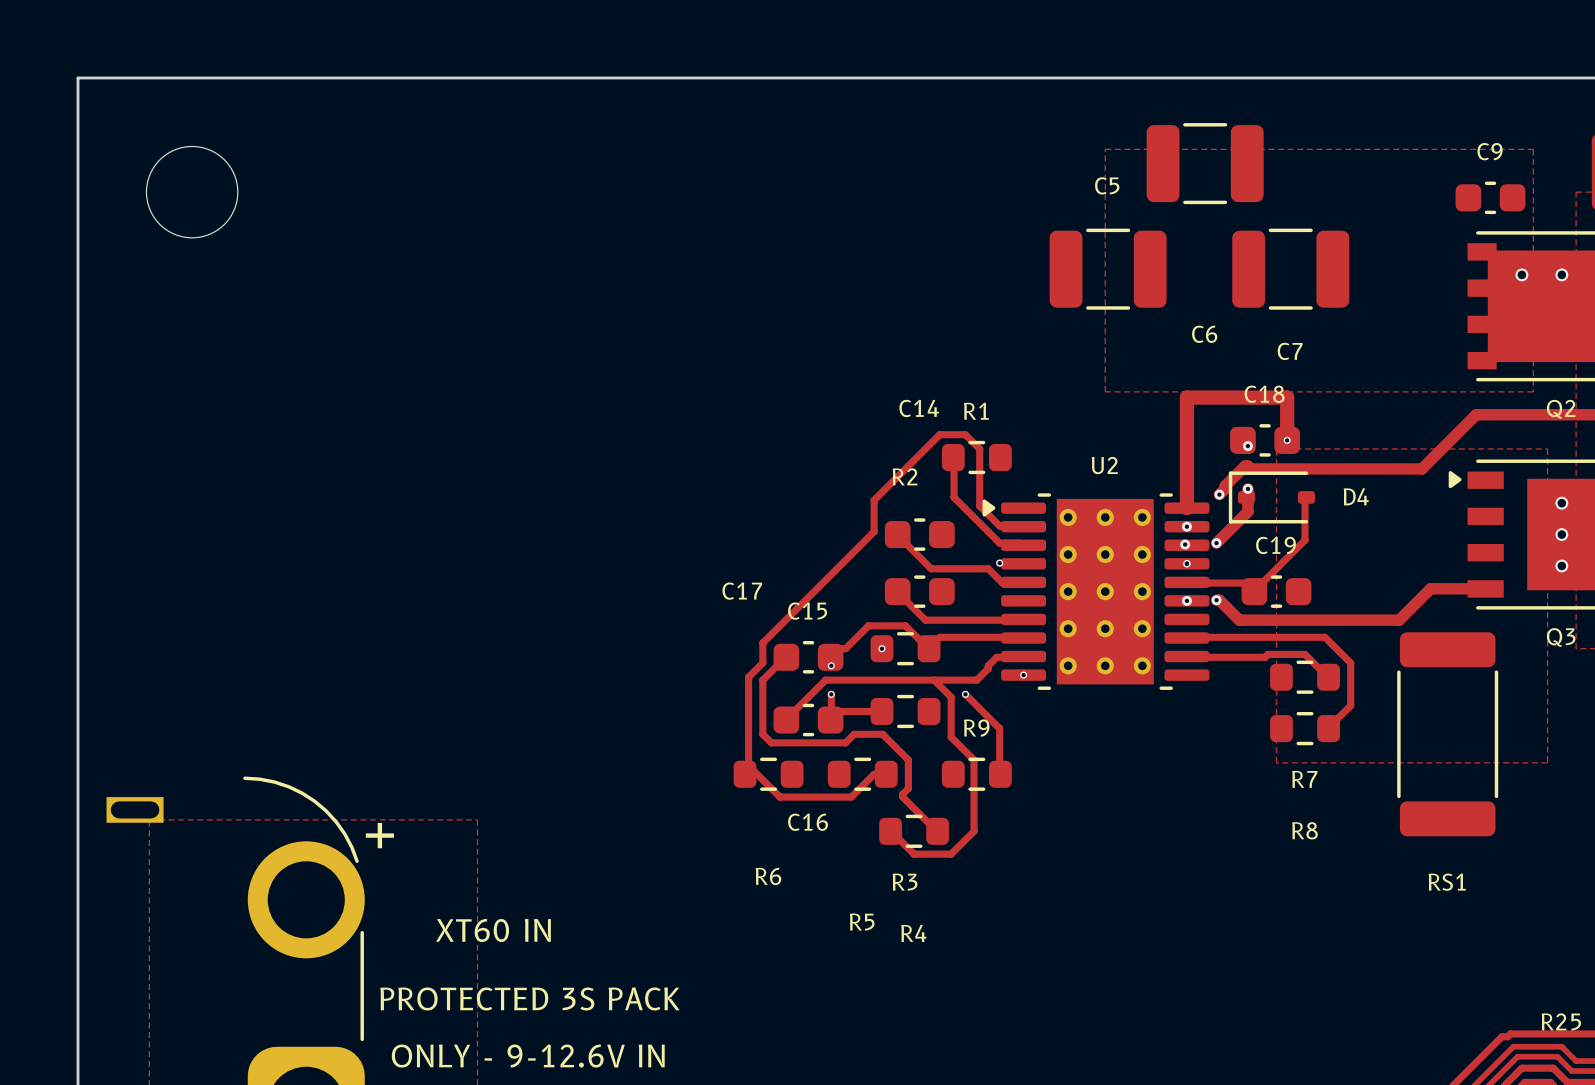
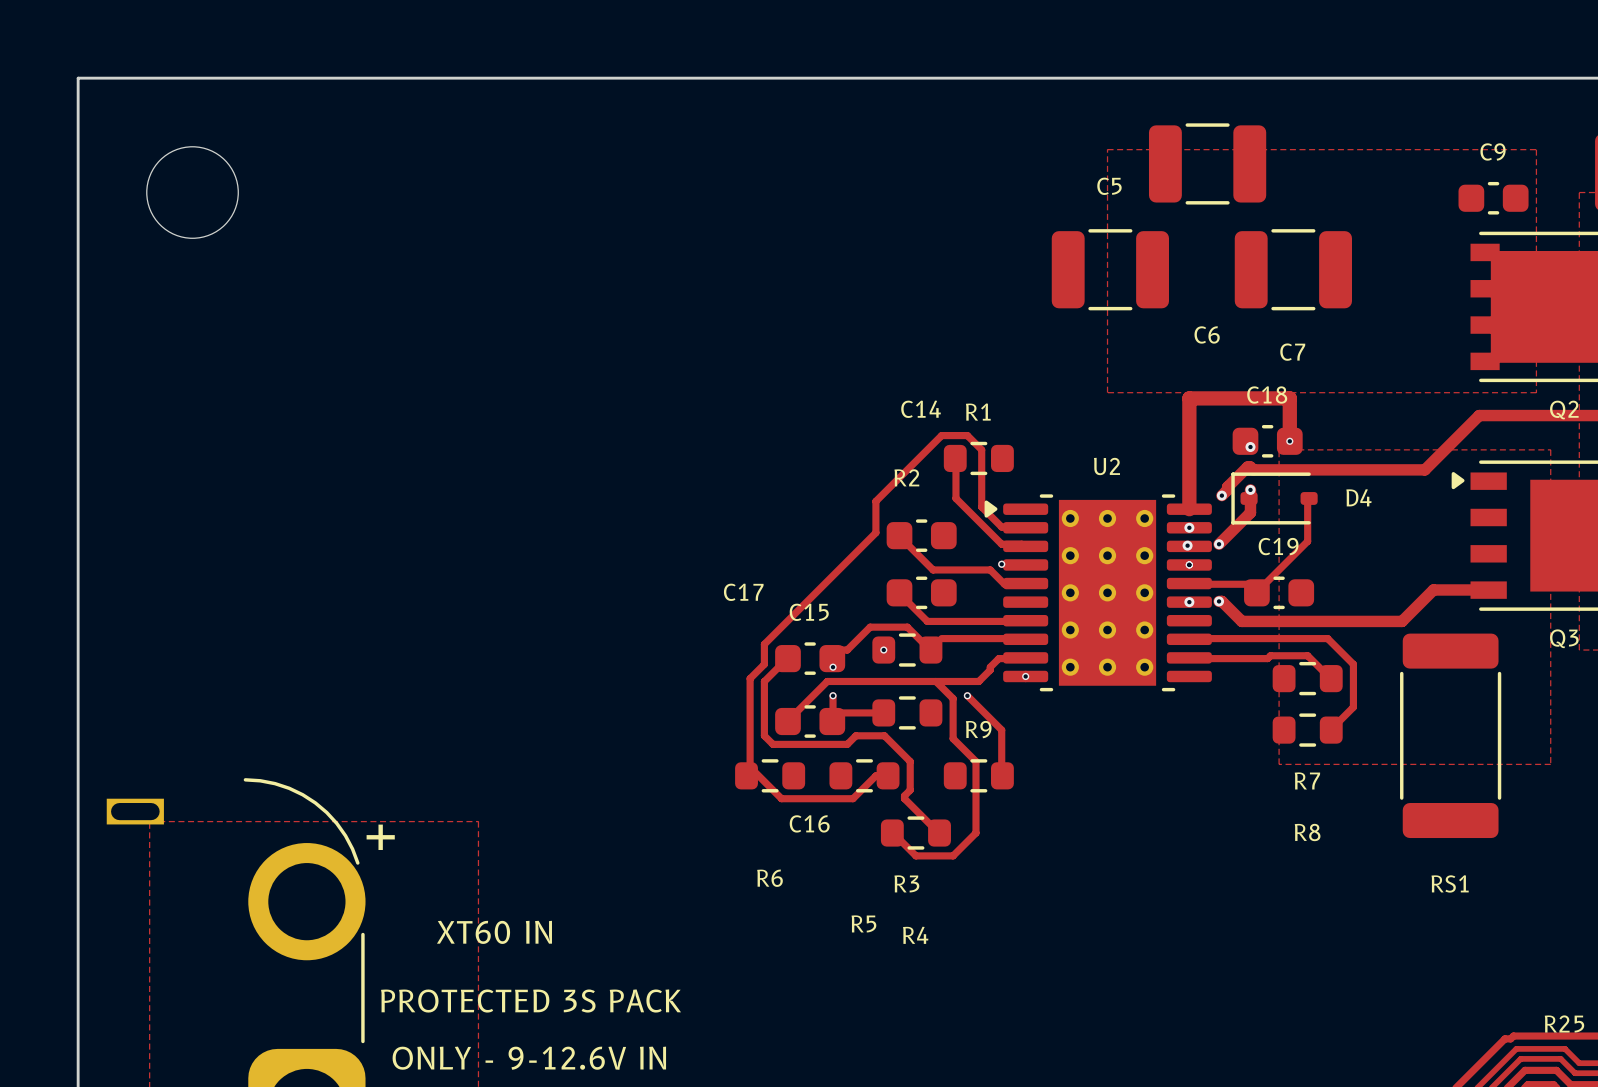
via: (1521, 274) -> none
via: (1561, 274) -> none
via: (1561, 503) -> none
via: (1561, 534) -> none
via: (1561, 565) -> none

